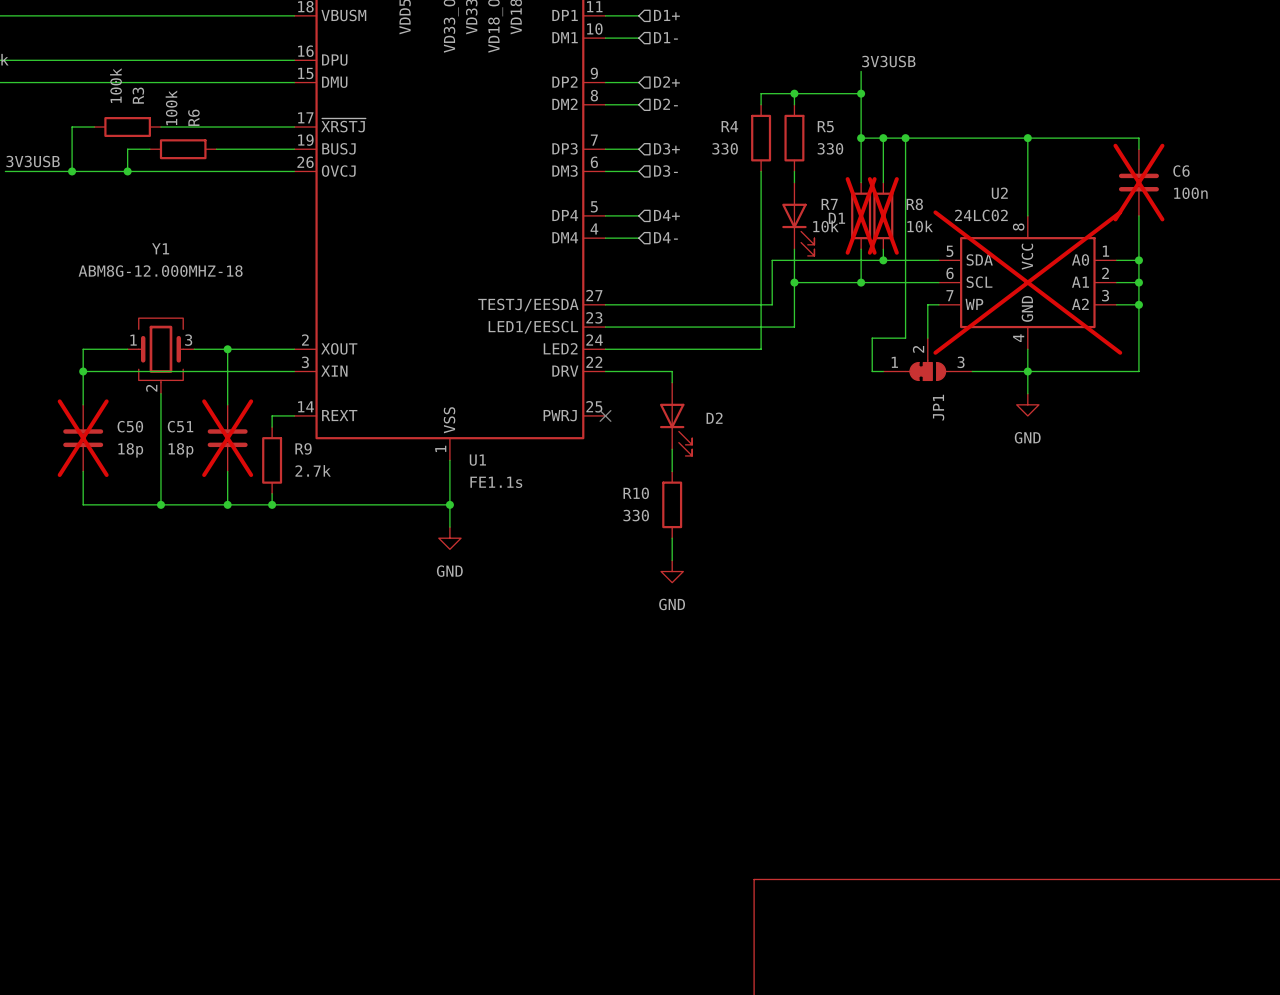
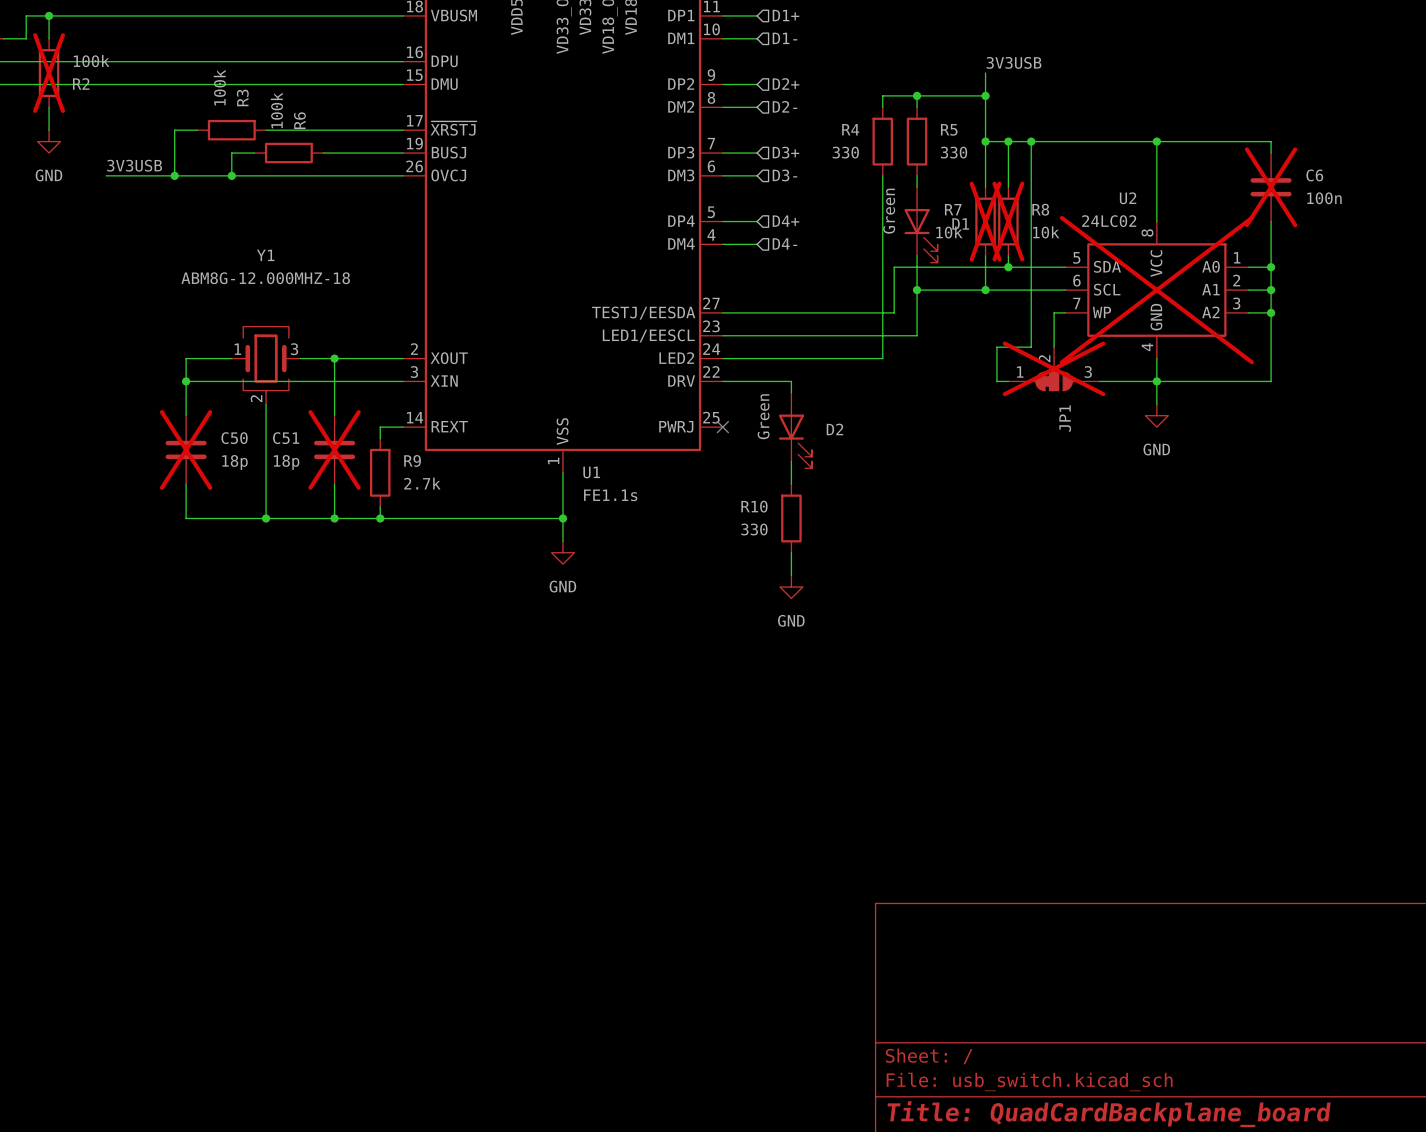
D1 value: none -> Green (889, 211)
JP1 do-not-place cross: none -> (1054, 368)
D2 value: none -> Green (763, 416)

